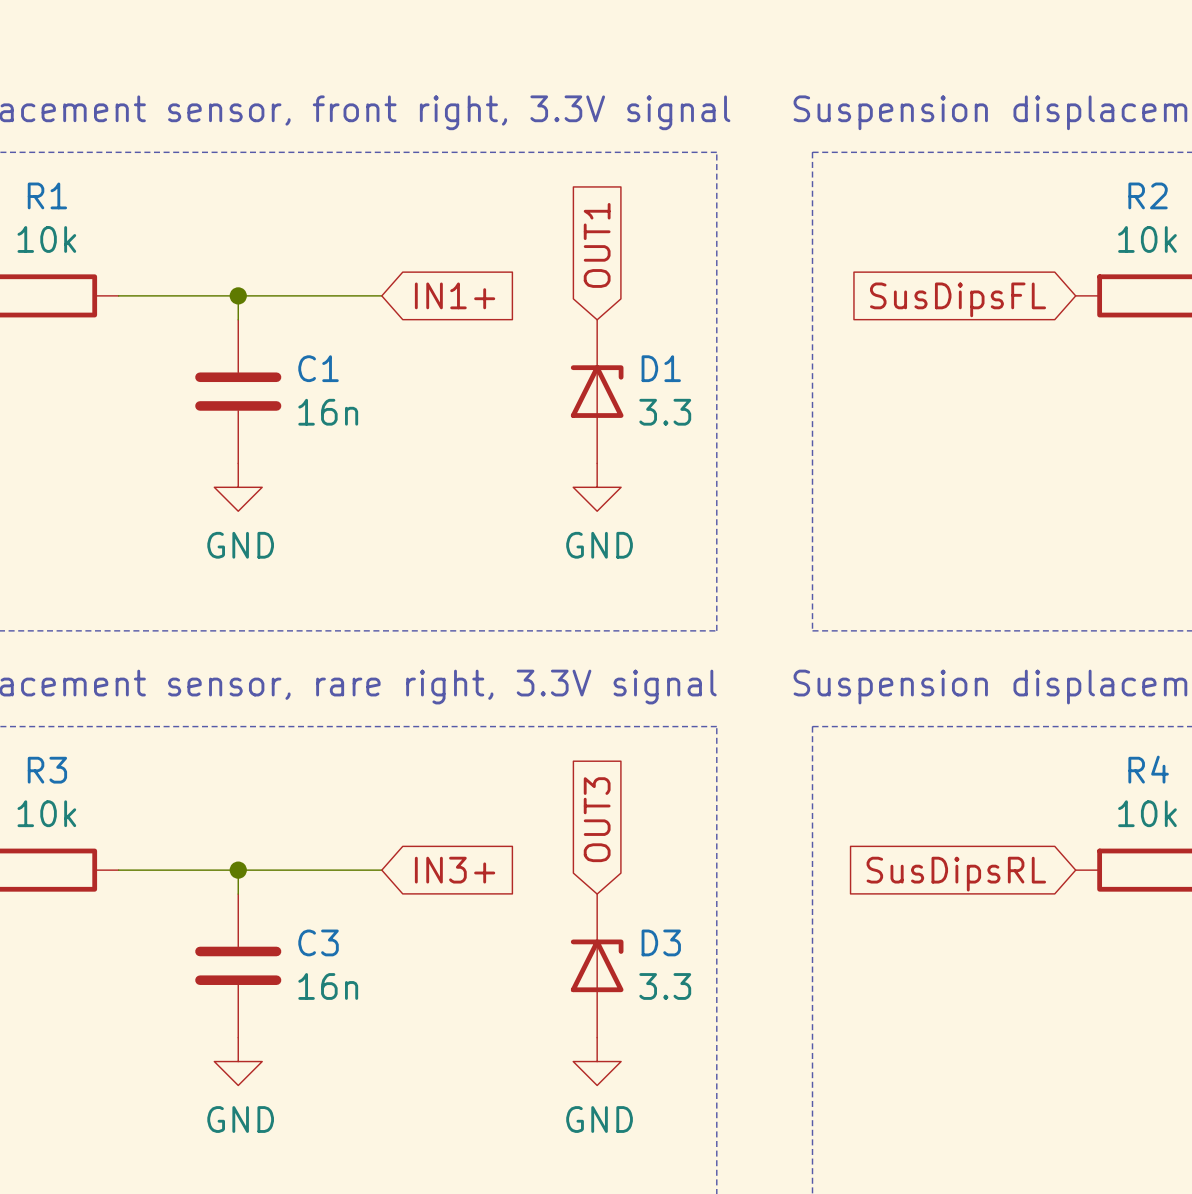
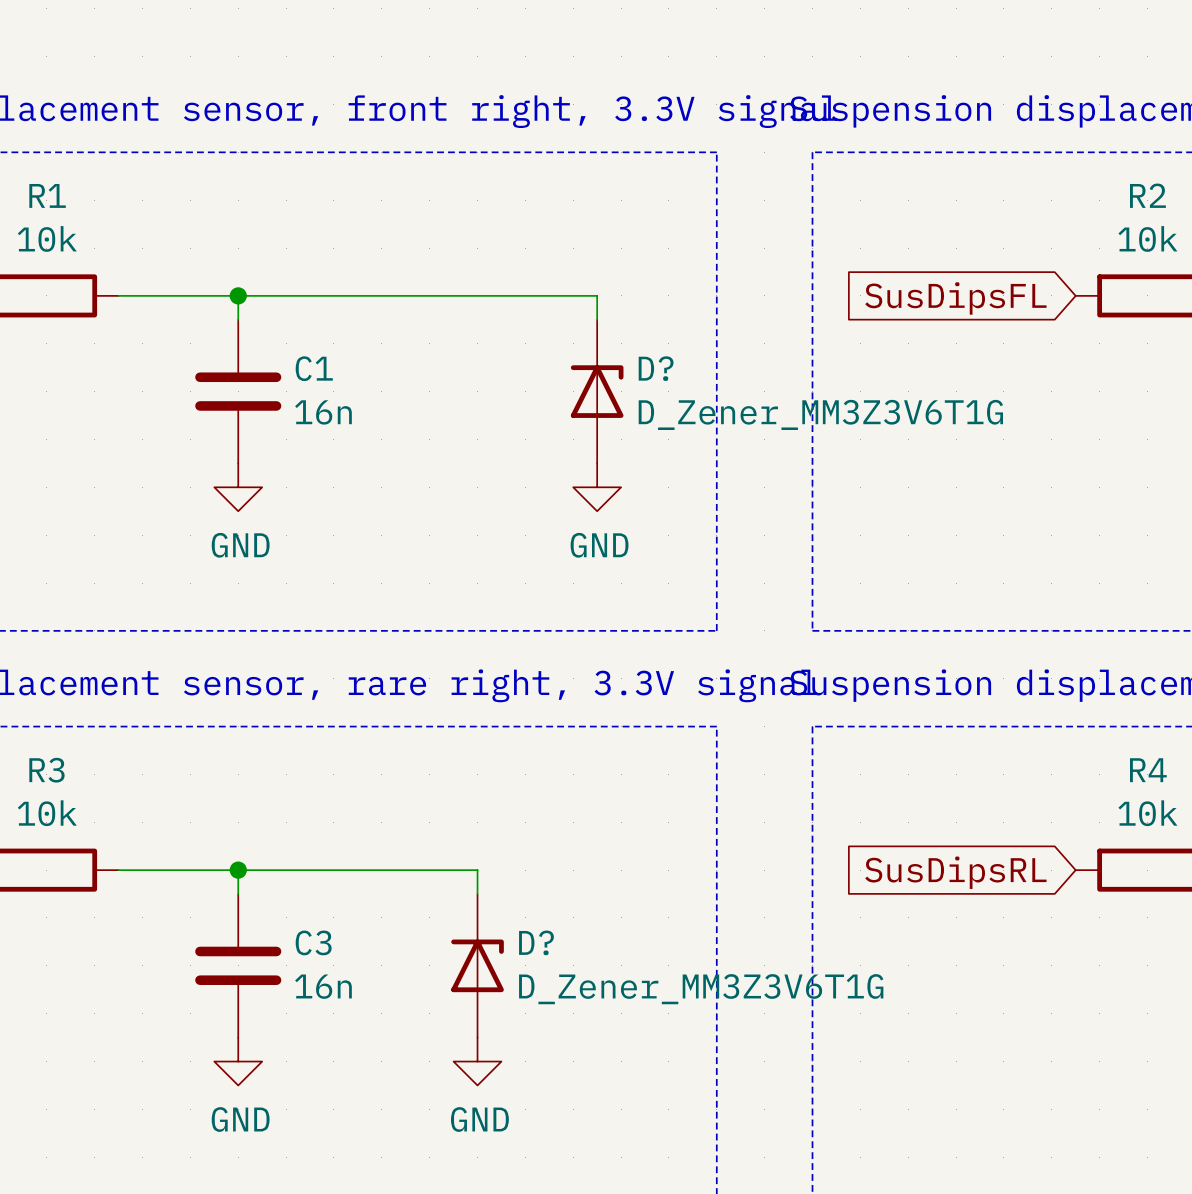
global label: OUT1 (597, 245) -> none
wire: none -> (381, 295) (597, 295) (597, 319)
global label: IN1+ (455, 295) -> none
D1 name: D1 (661, 368) -> D? (656, 368)
D1 value: 3.3 (665, 412) -> D_Zener_MM3Z3V6T1G (820, 414)
global label: OUT3 (597, 819) -> none
wire: none -> (381, 870) (477, 870) (477, 894)
global label: IN3+ (455, 870) -> none
D?: none -> D_Zener_MM3Z3V6T1G (477, 965)
D3: 3.3 (597, 965) -> none
power symbol position: GND (597, 1061) -> GND (477, 1061)

